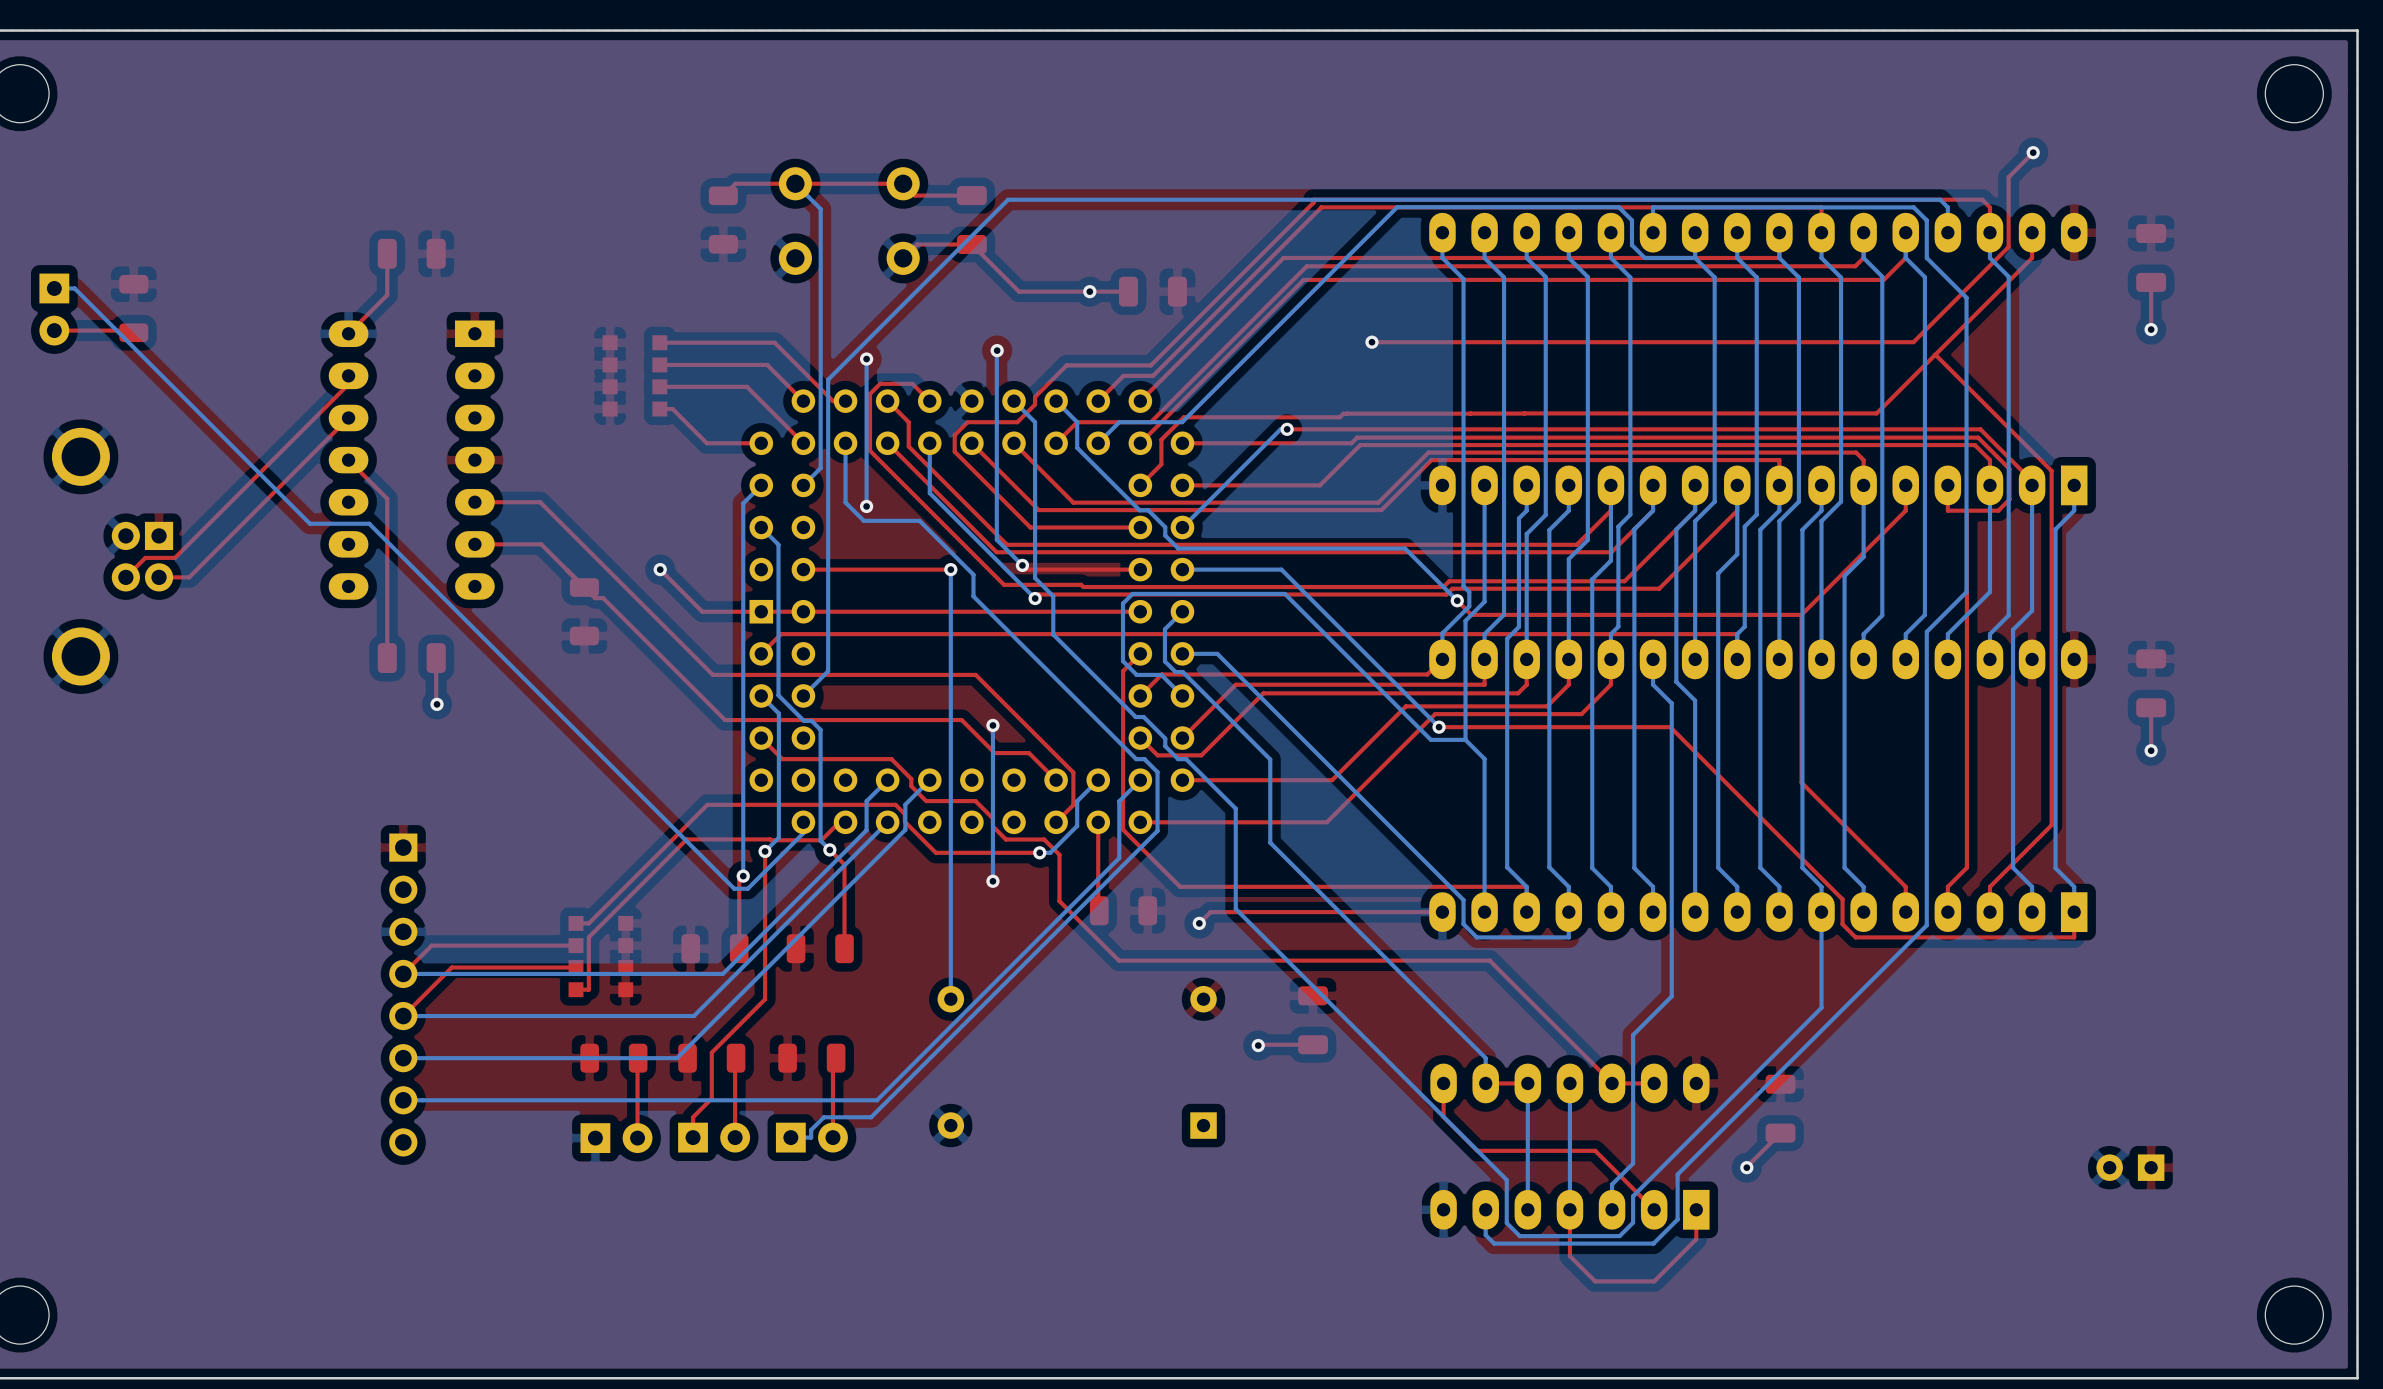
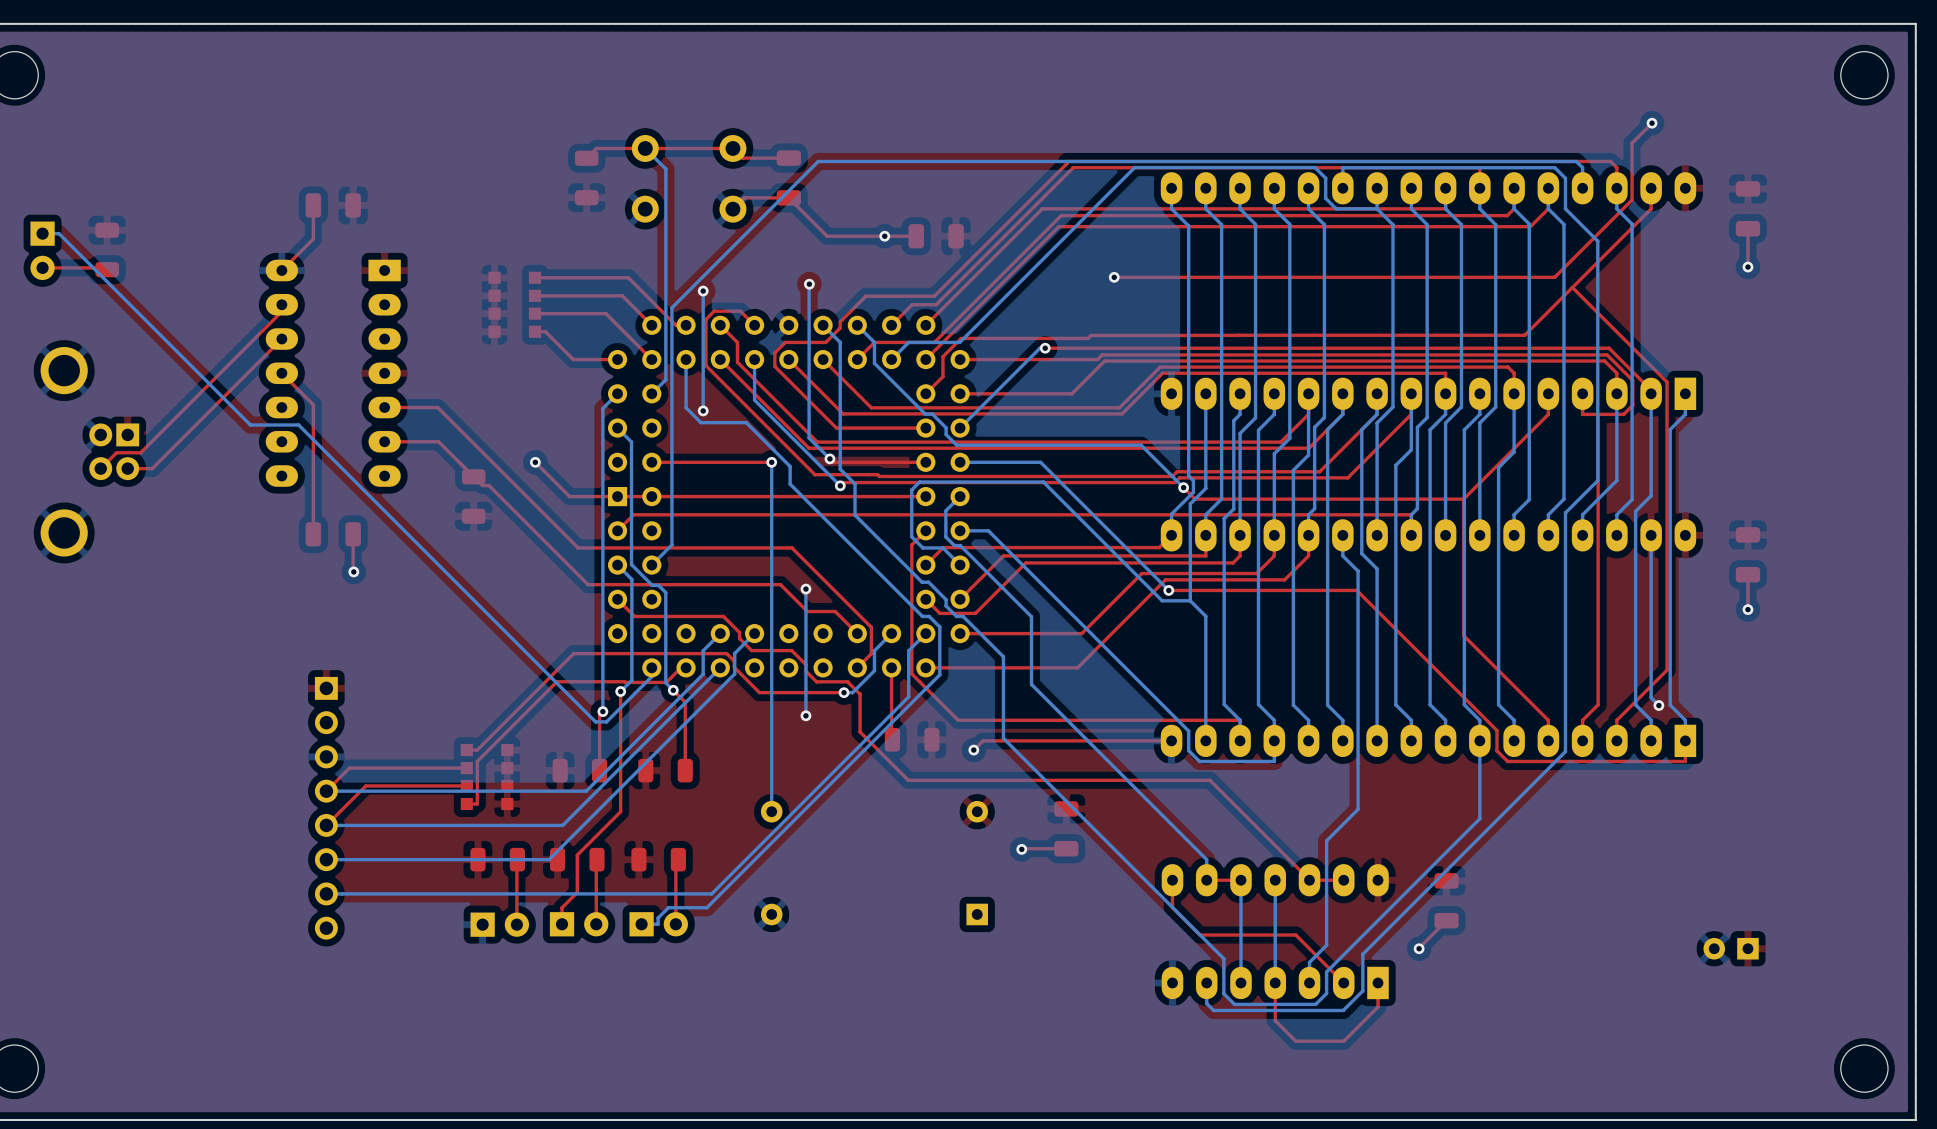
bottom track: none -> (1651, 535) (1651, 697) (1658, 705)
via: none -> (1658, 705)

